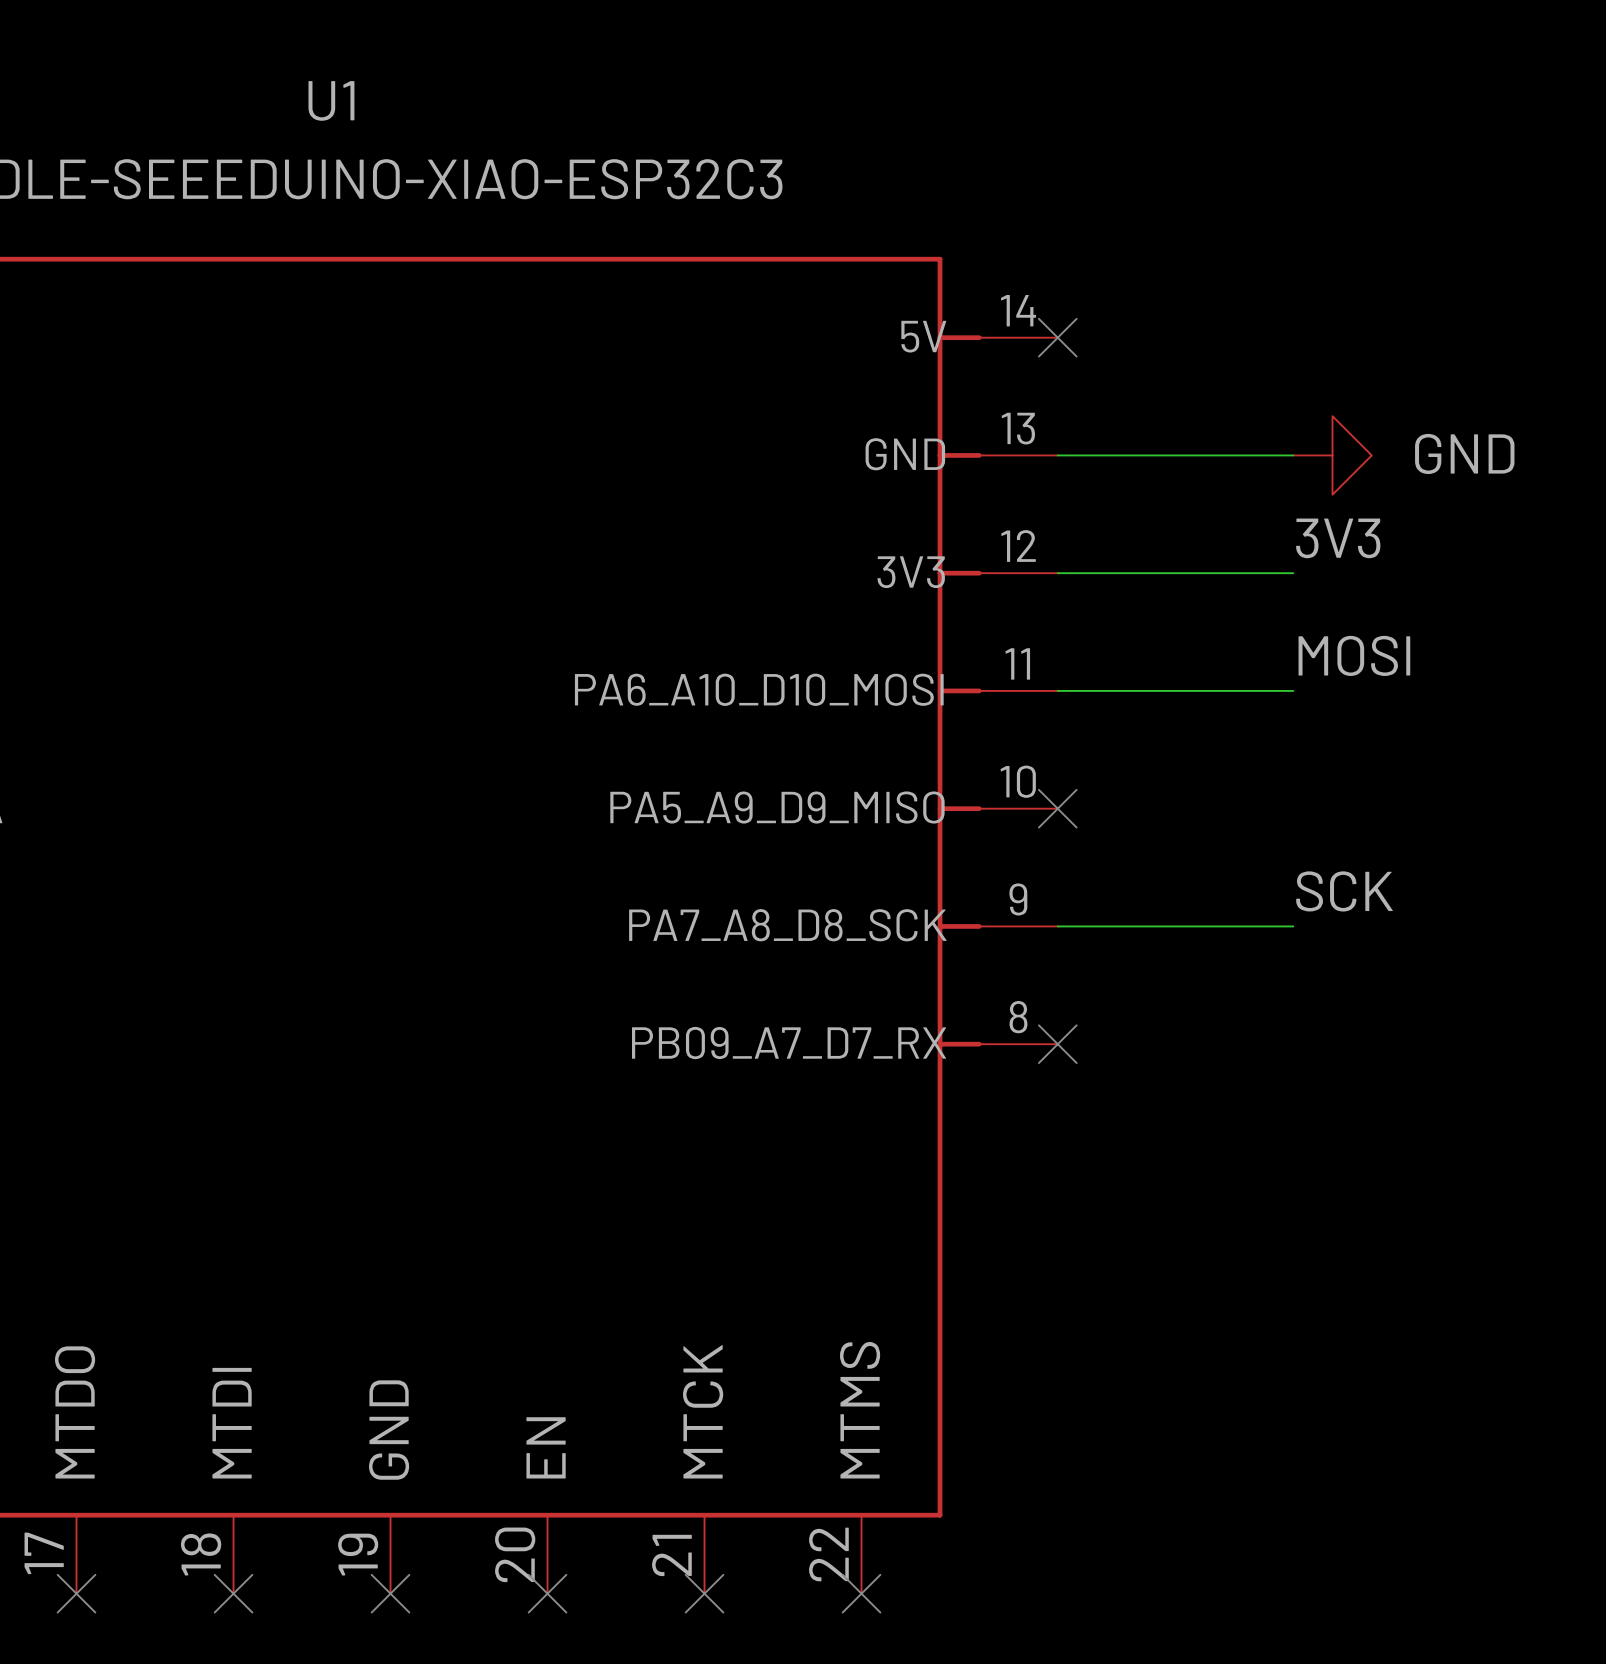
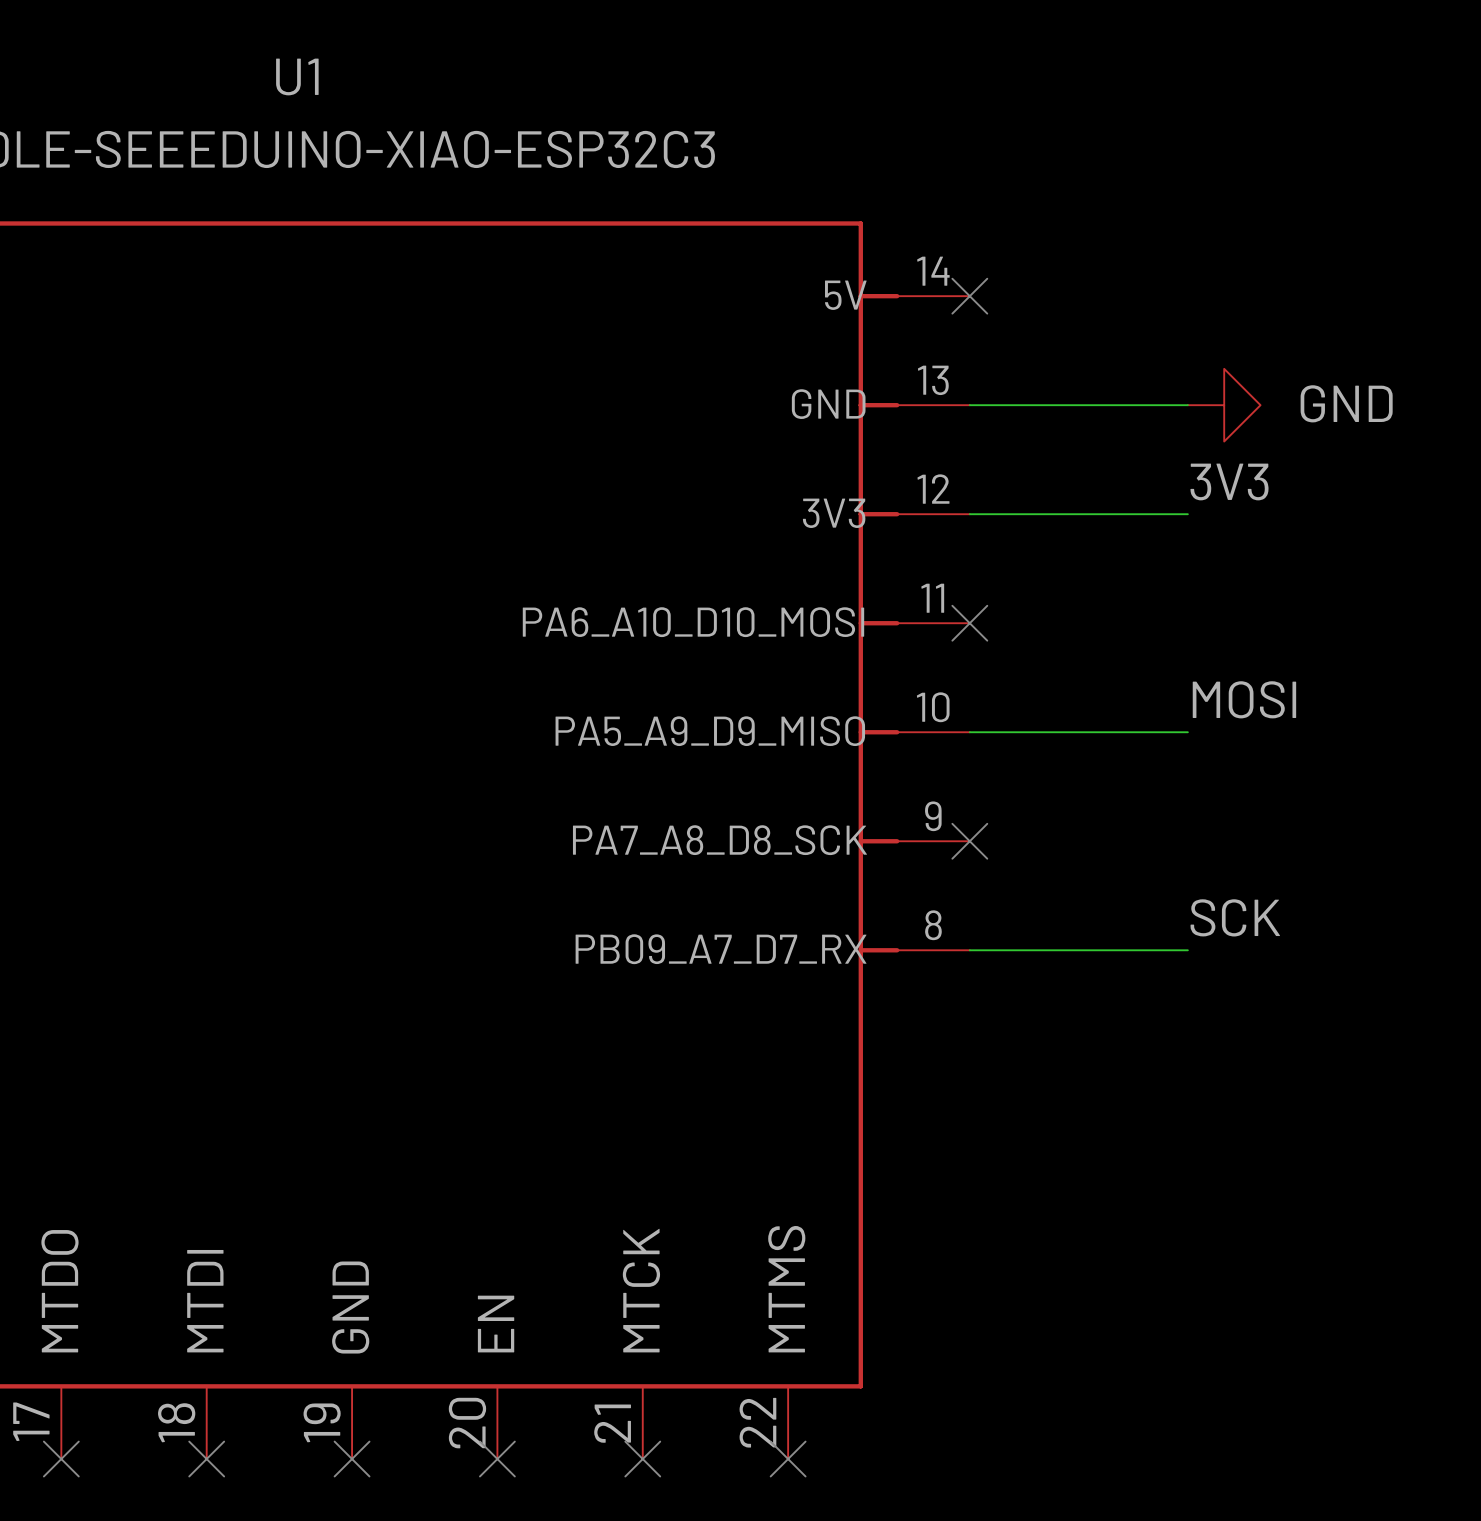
label position: MOSI (1354, 655) -> MOSI (1244, 699)
wire: (1057, 690) (1293, 690) -> (969, 732) (1187, 732)
no-connect mark: none -> (969, 623)
no-connect mark: (1057, 808) -> none
label position: SCK (1344, 891) -> SCK (1235, 917)
wire: (1057, 926) (1293, 926) -> (969, 950) (1187, 950)
no-connect mark: none -> (969, 841)
no-connect mark: (1057, 1044) -> none

